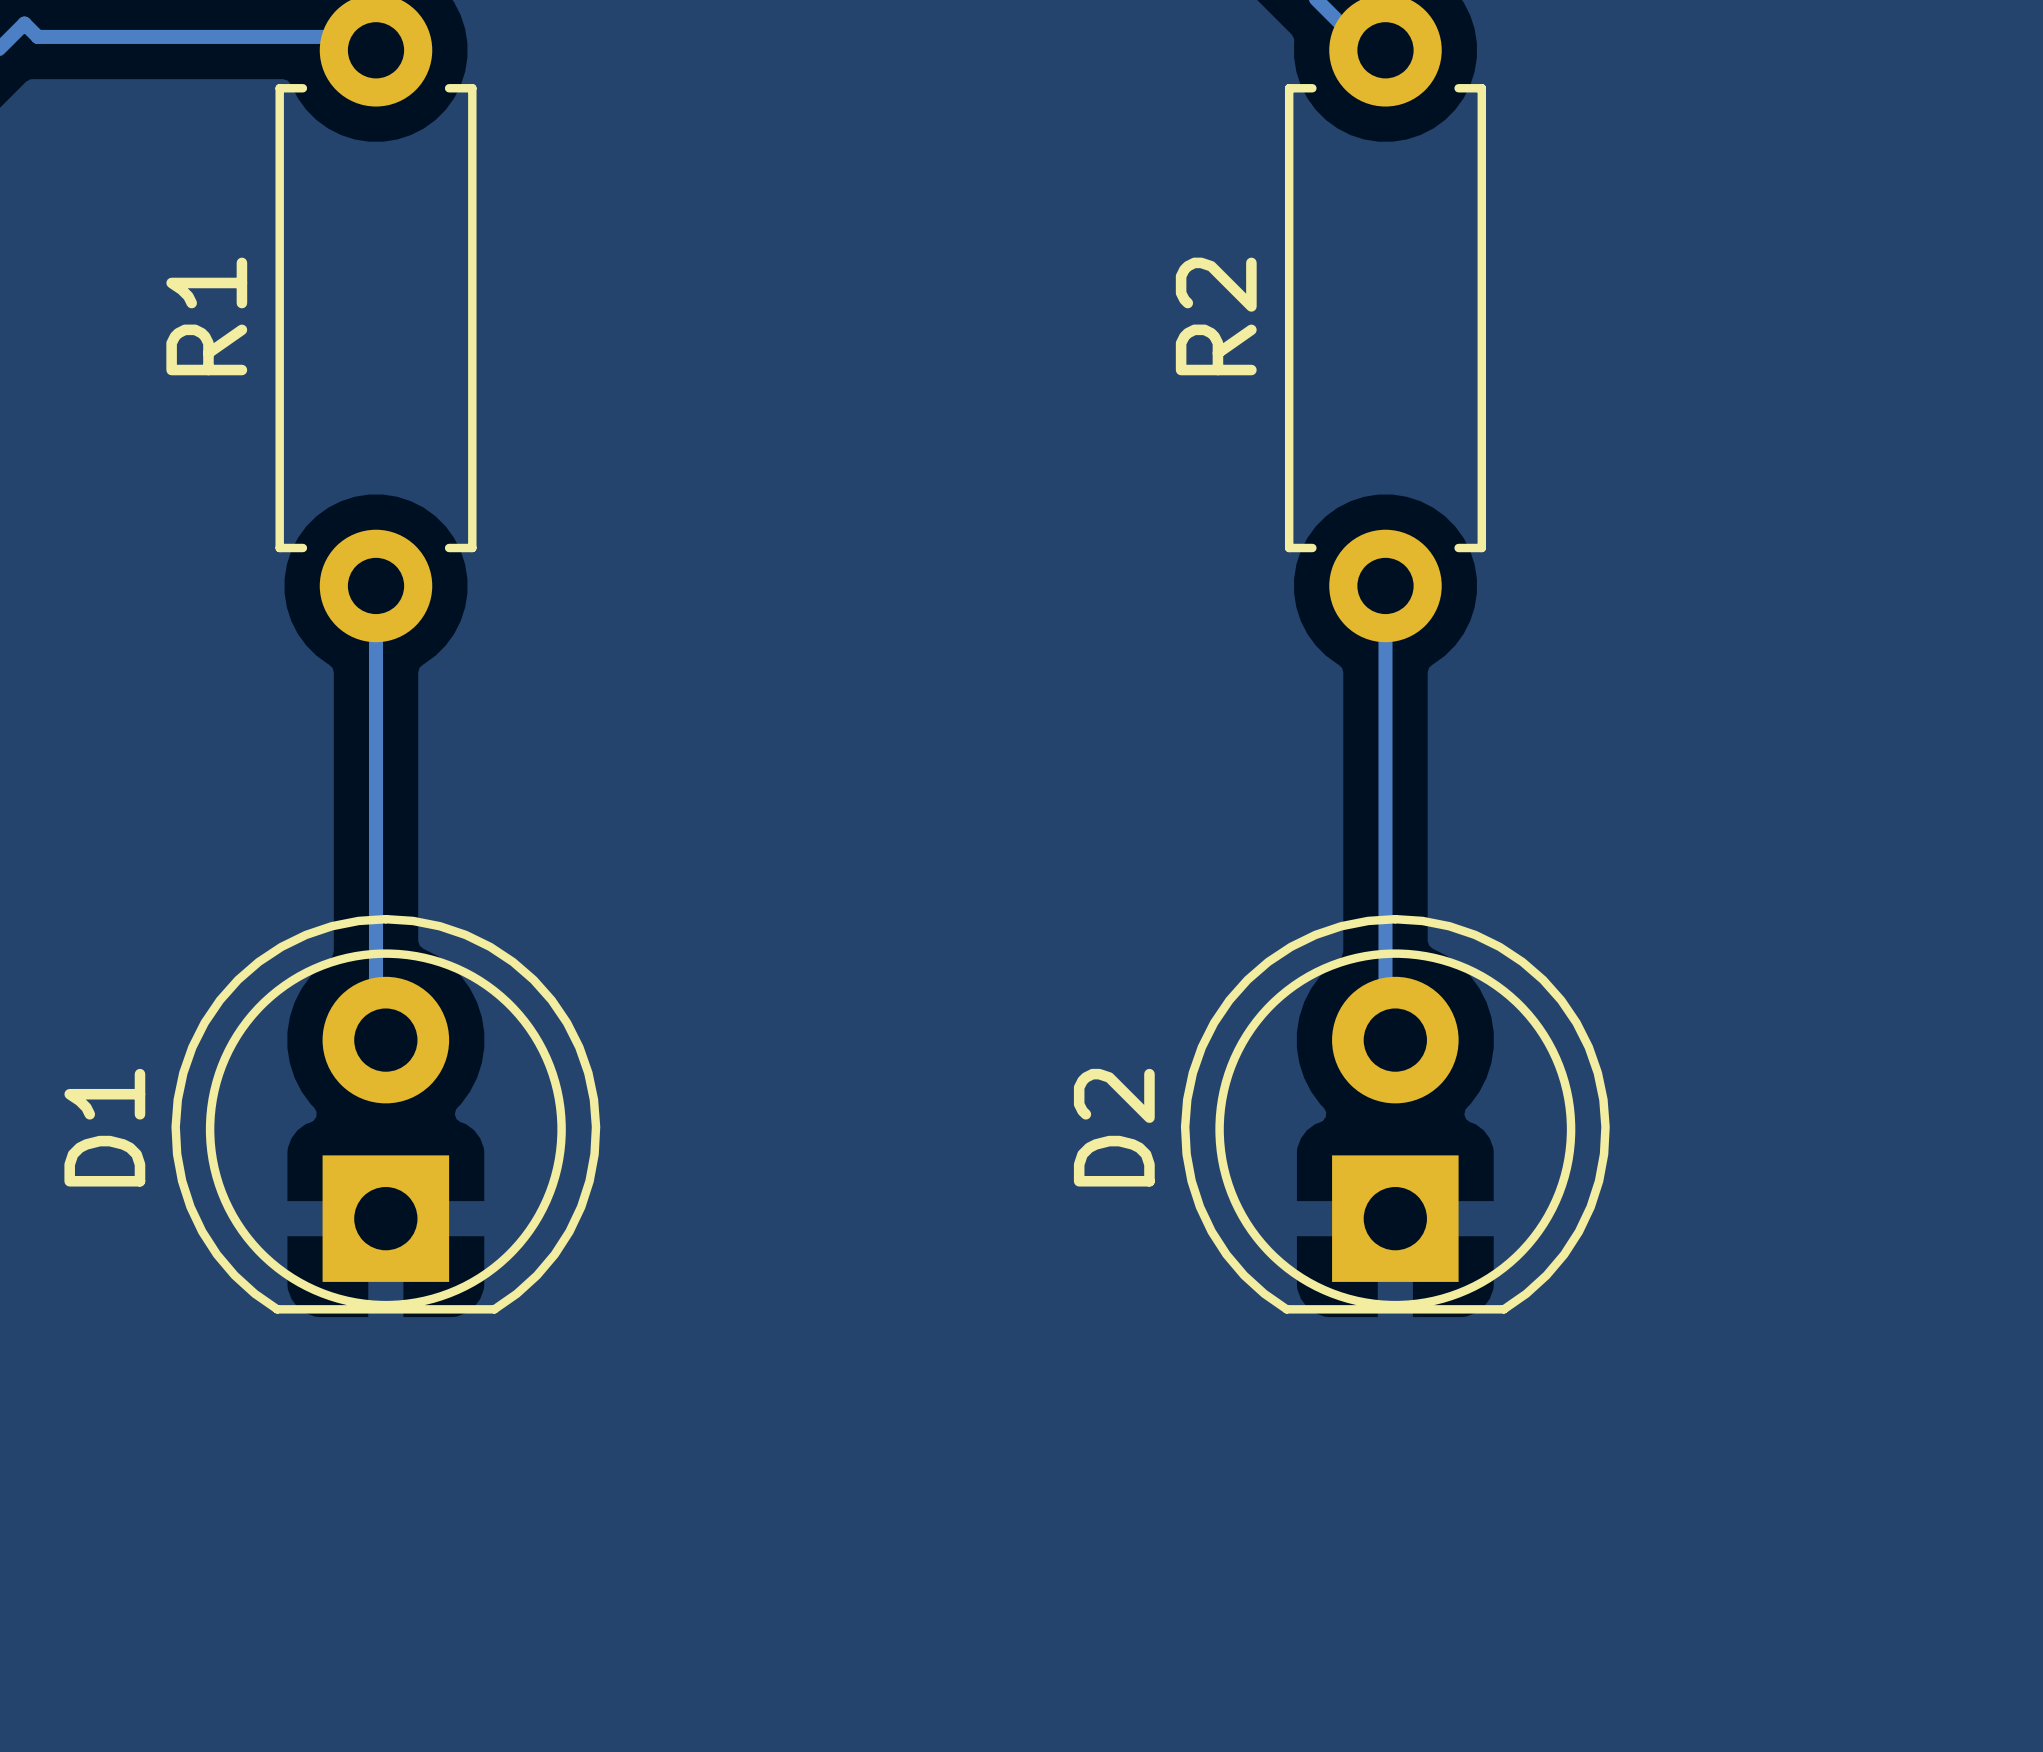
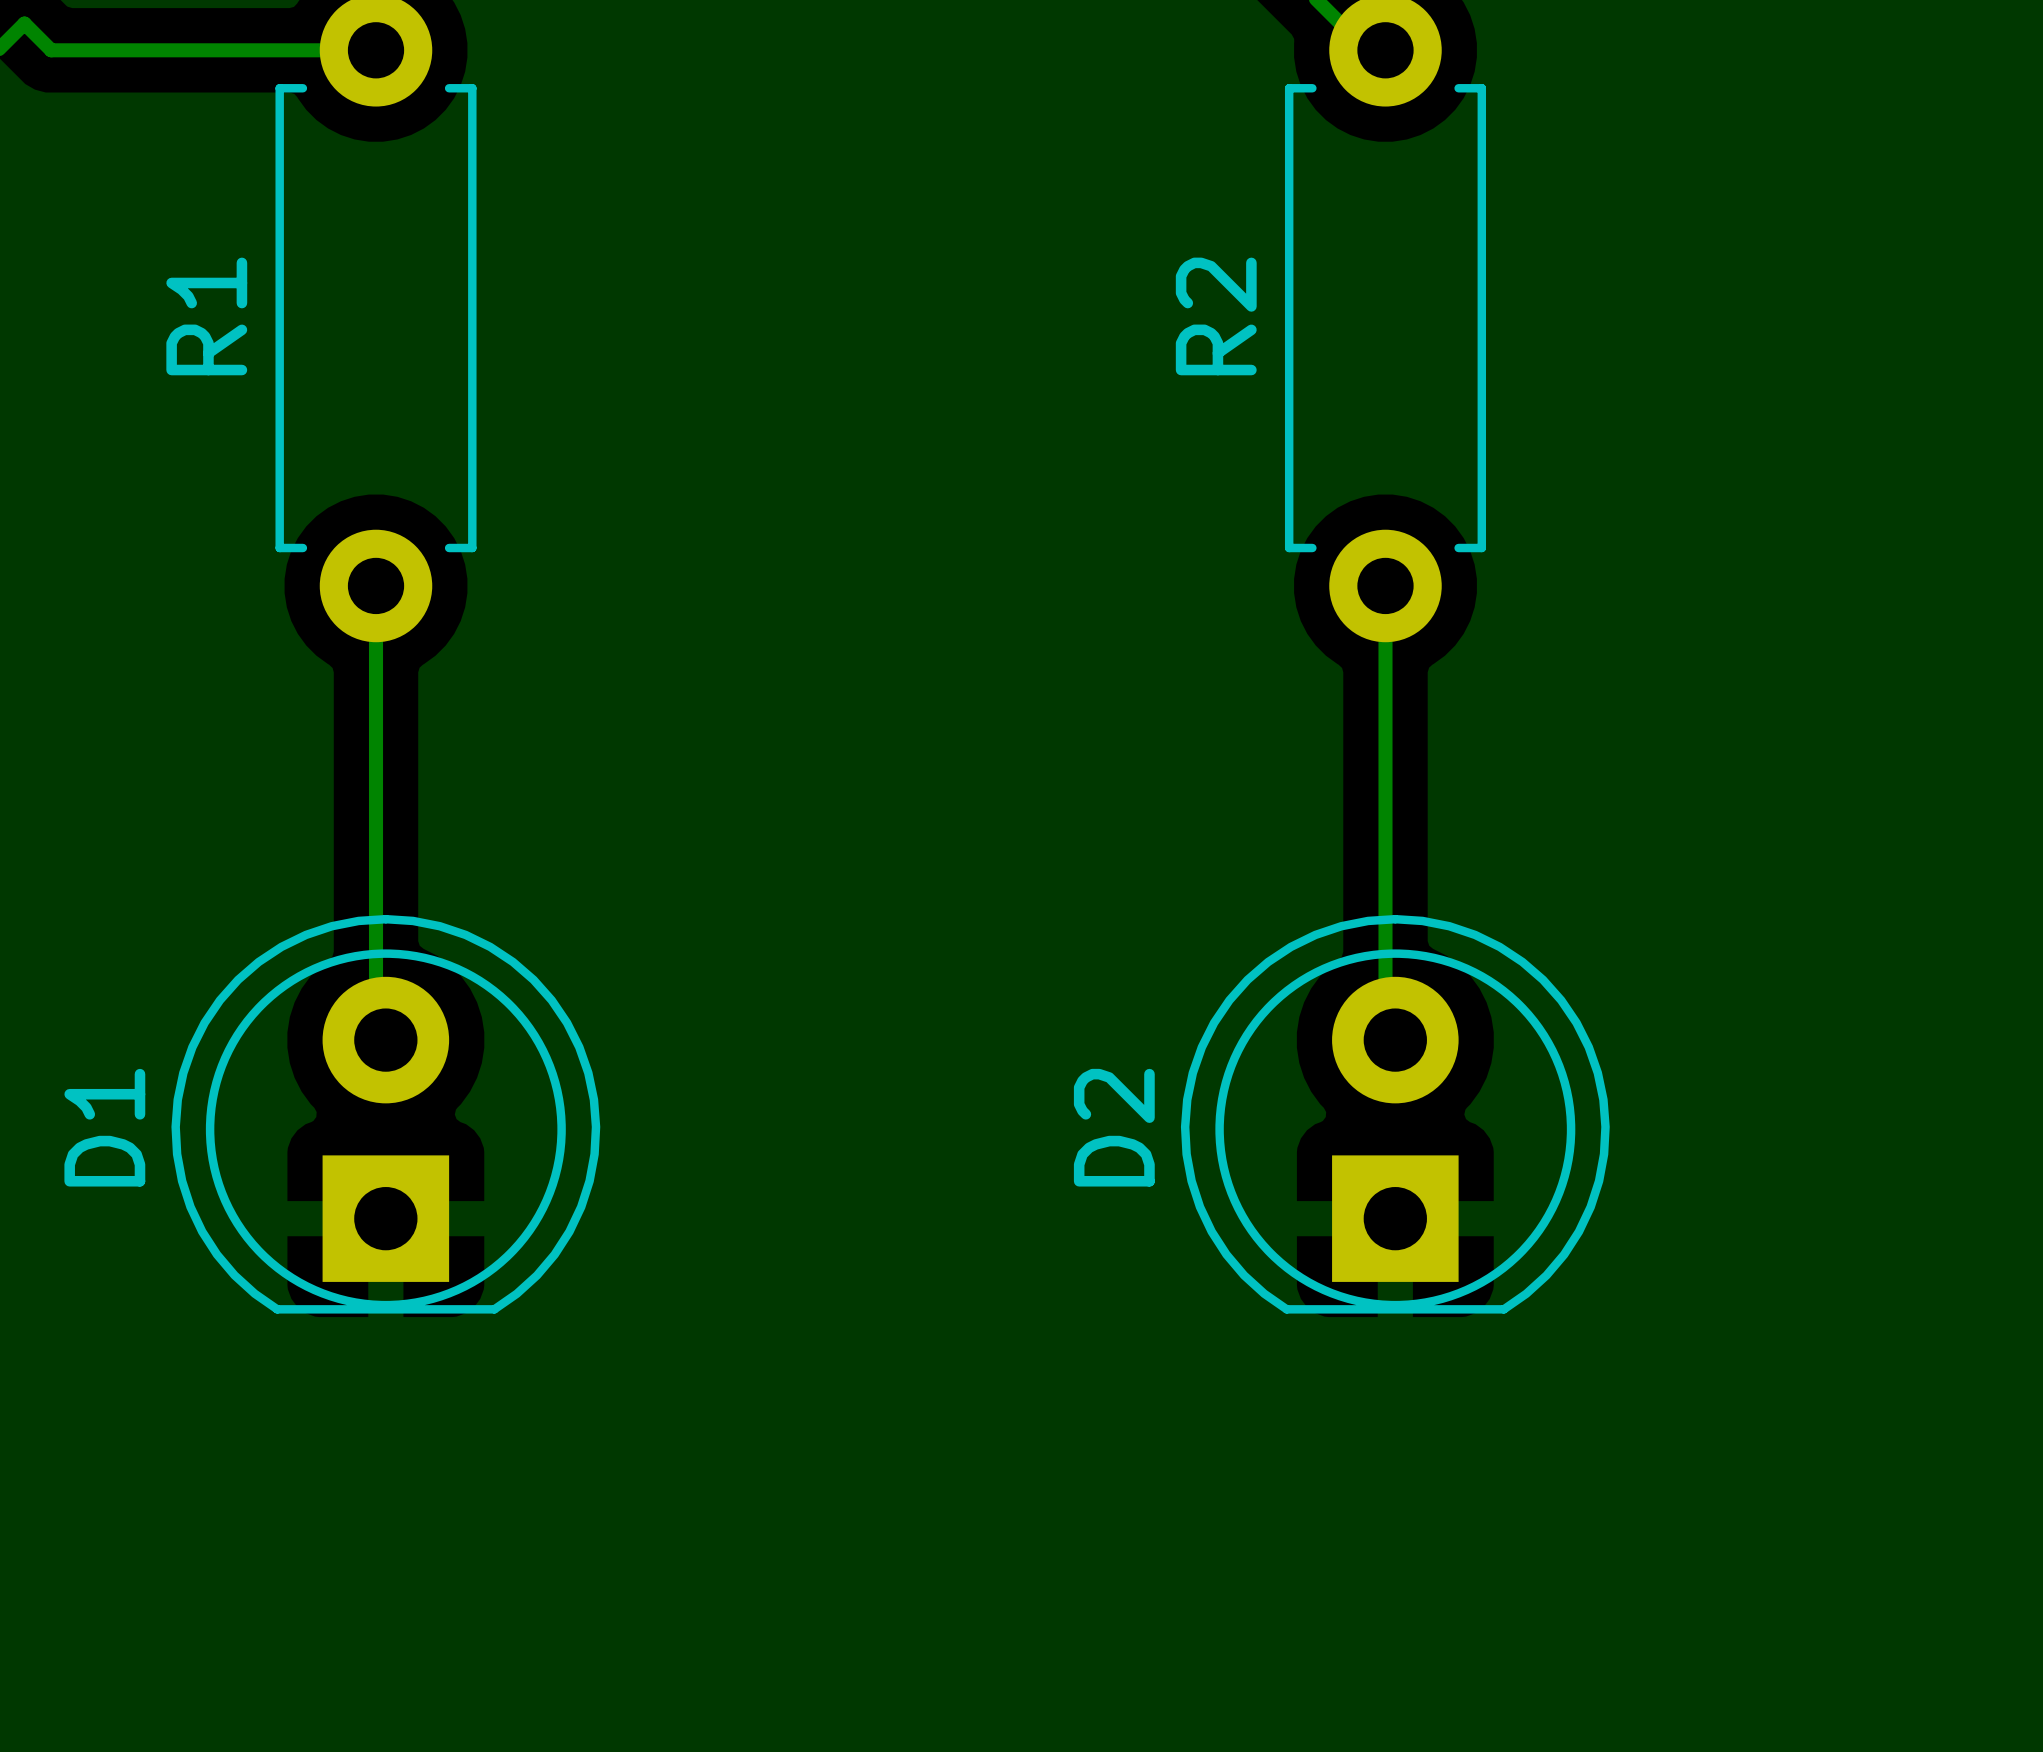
bottom track: (37, 36) (376, 36) -> (37, 36) (51, 50) (376, 50)

